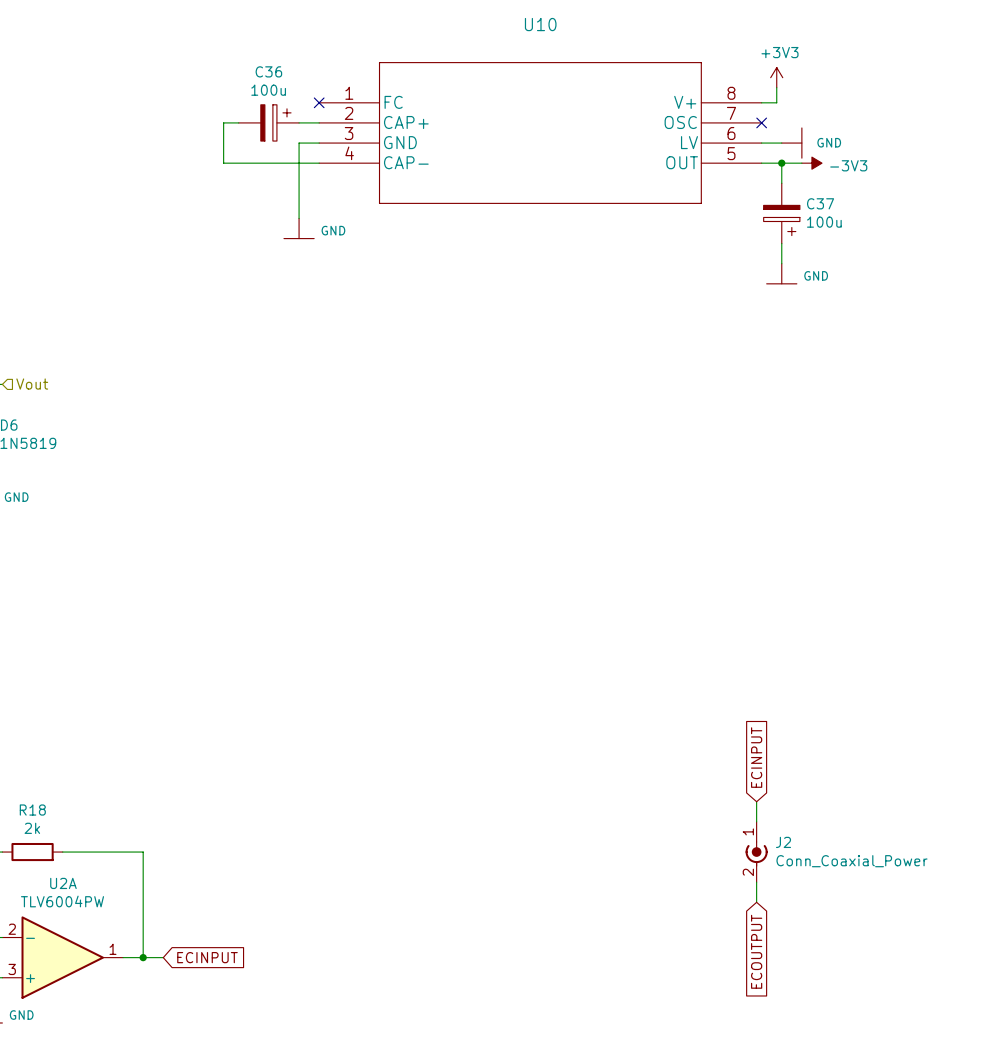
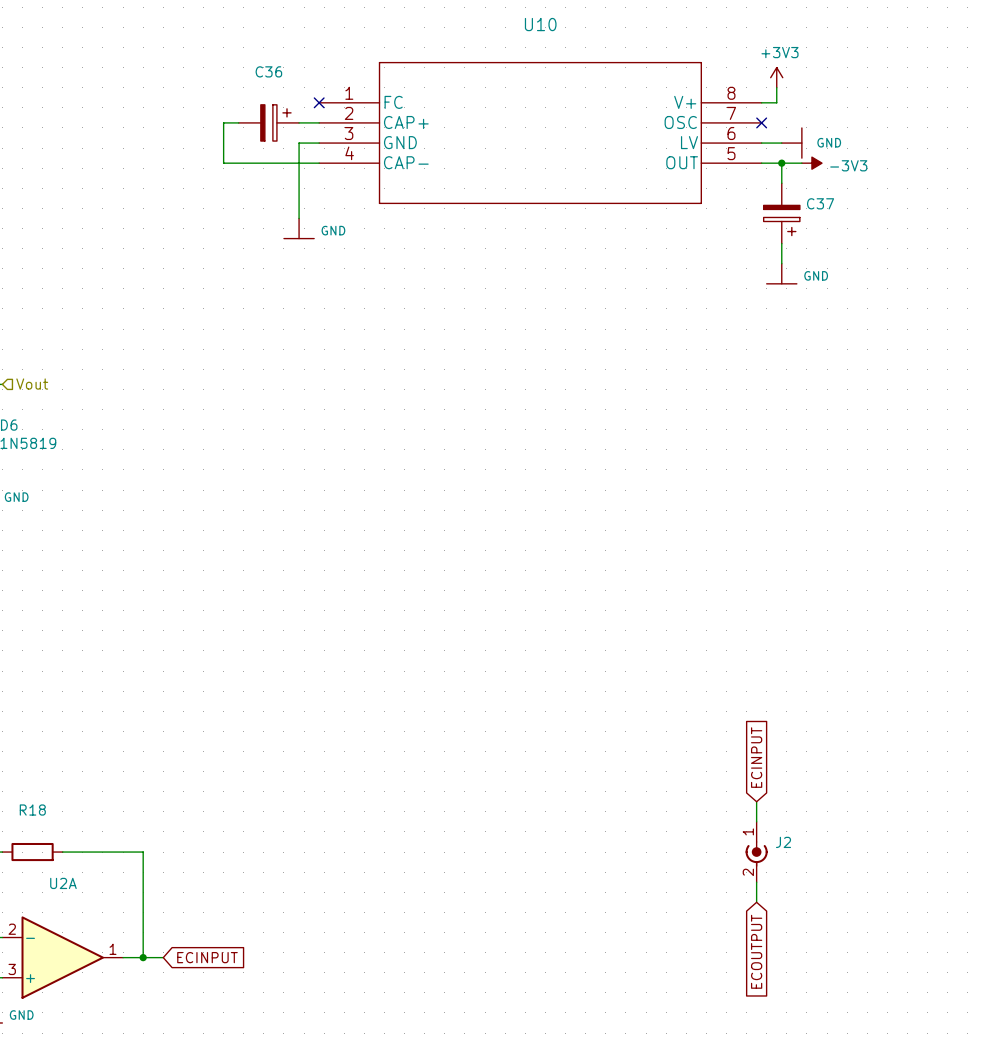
C36 value: 100u (268, 90) -> none
C37 value: 100u (824, 222) -> none
R18 value: 2k (32, 828) -> none
J2 value: Conn_Coaxial_Power (851, 861) -> none
U2A value: TLV6004PW (62, 901) -> none

